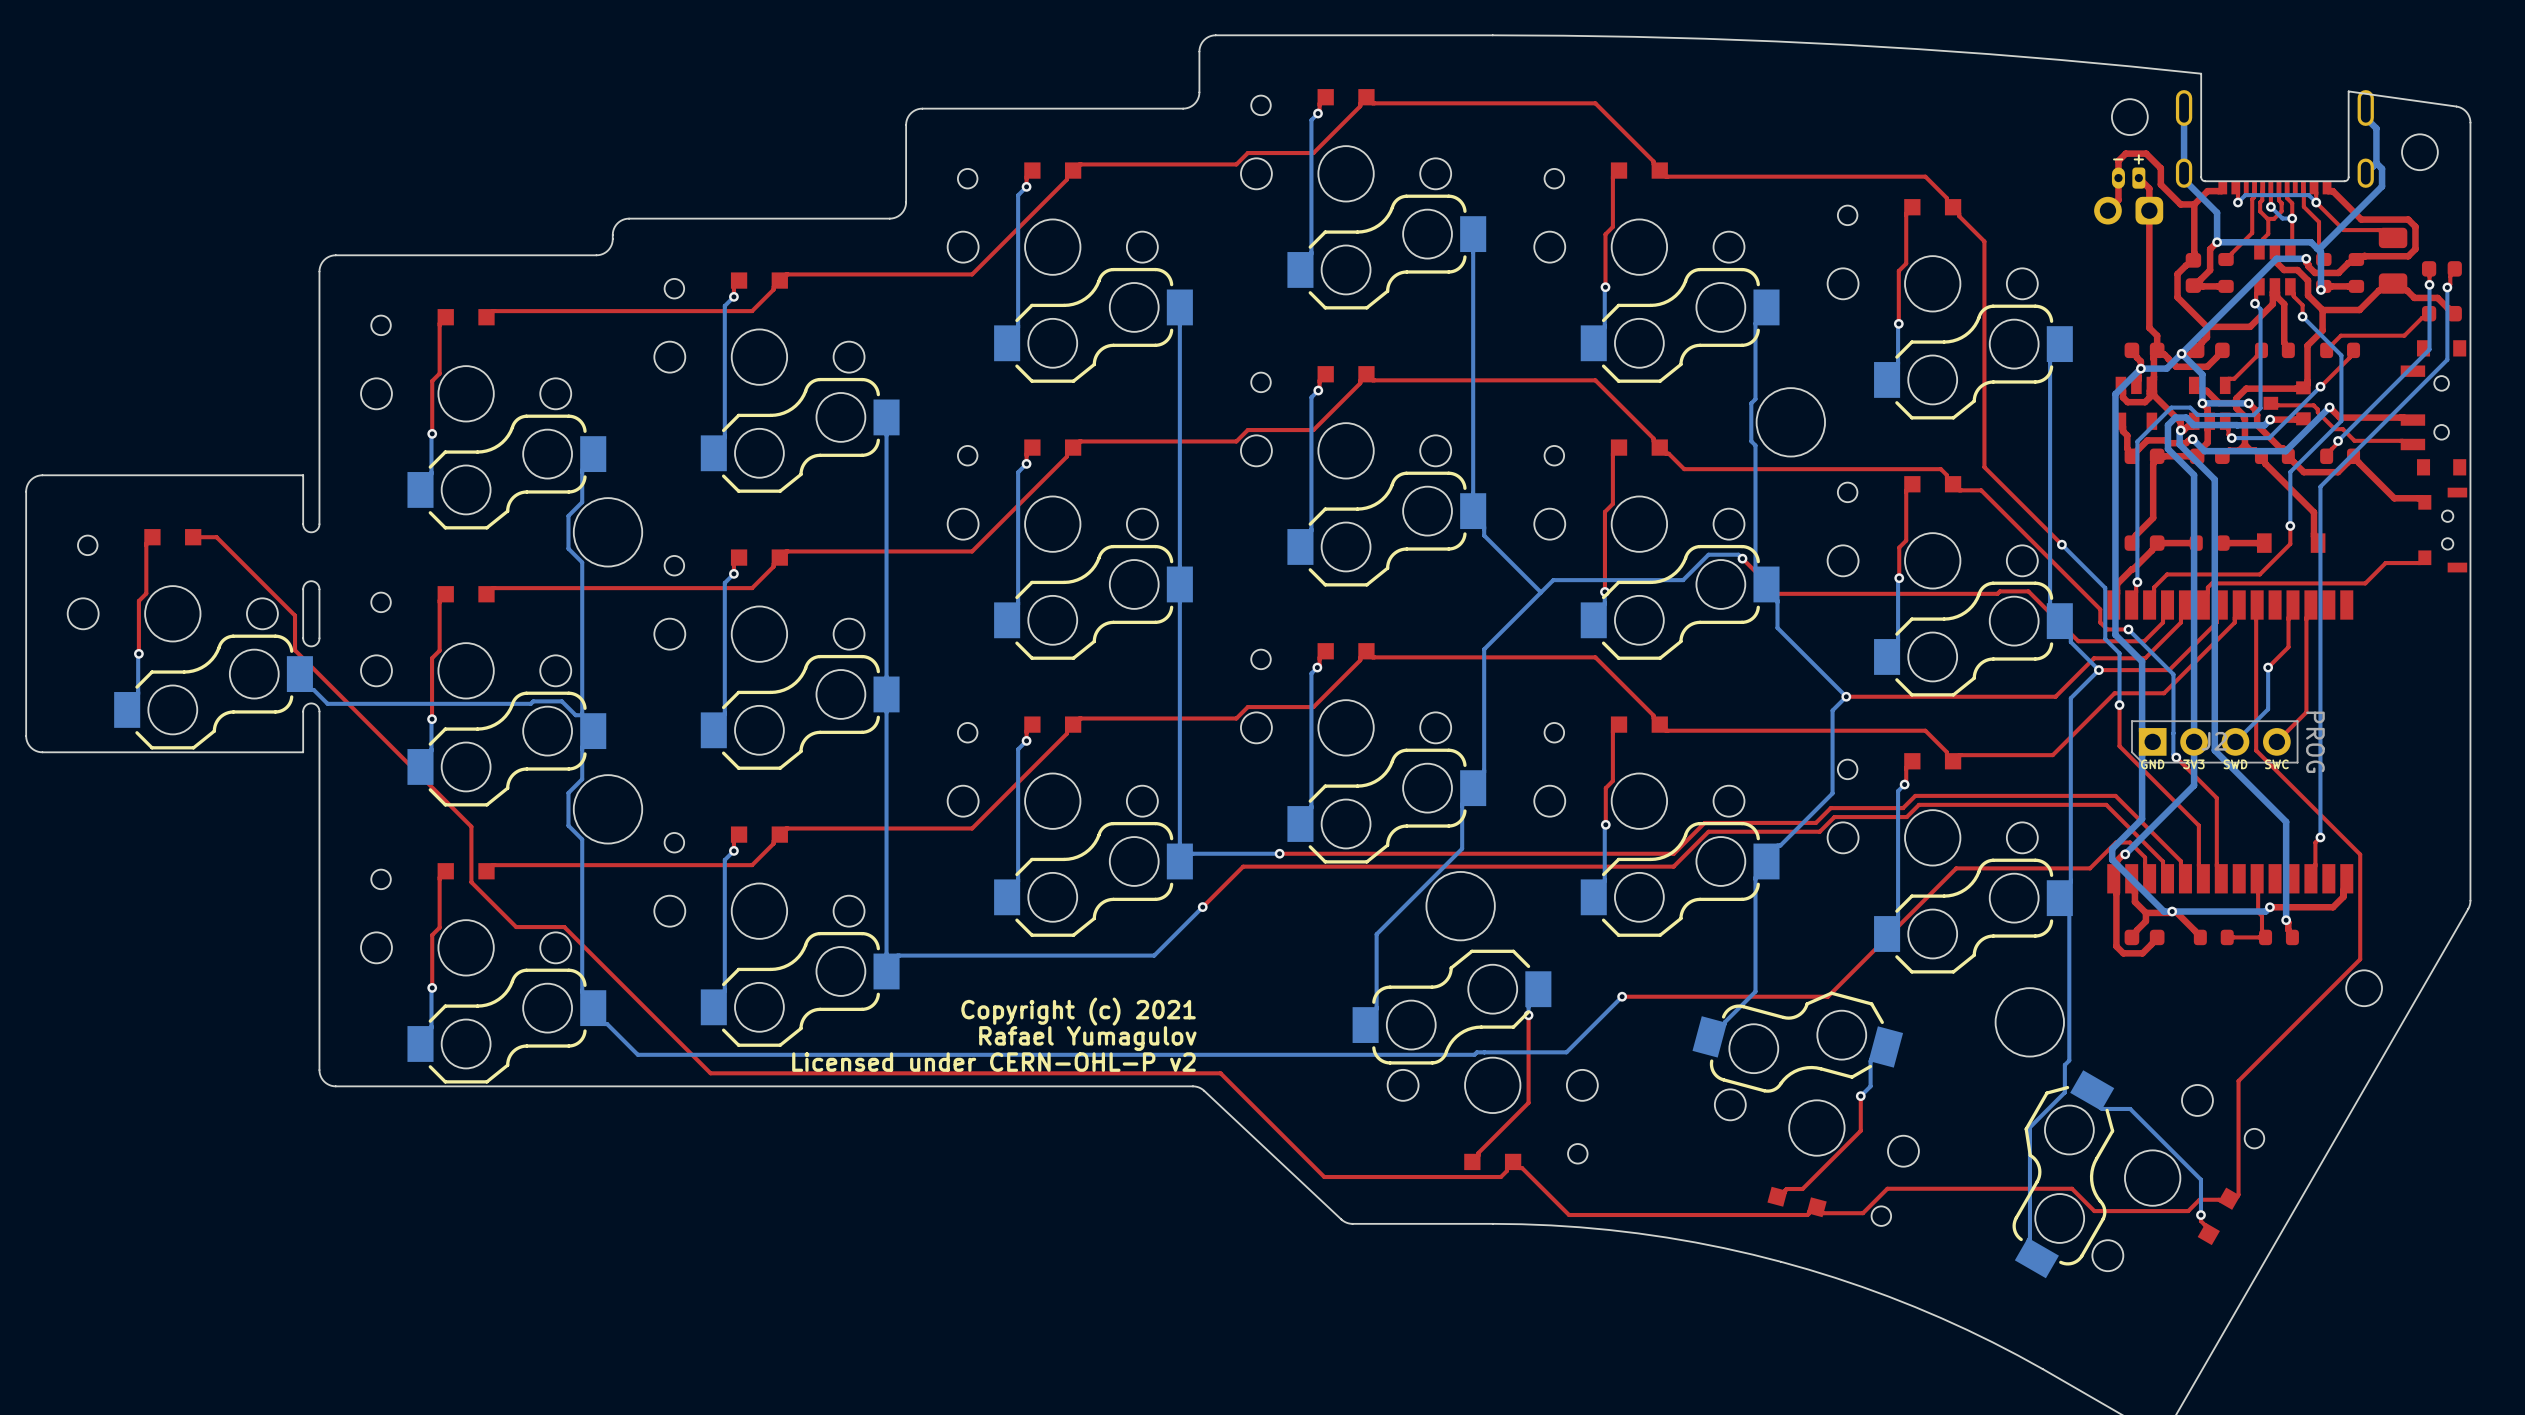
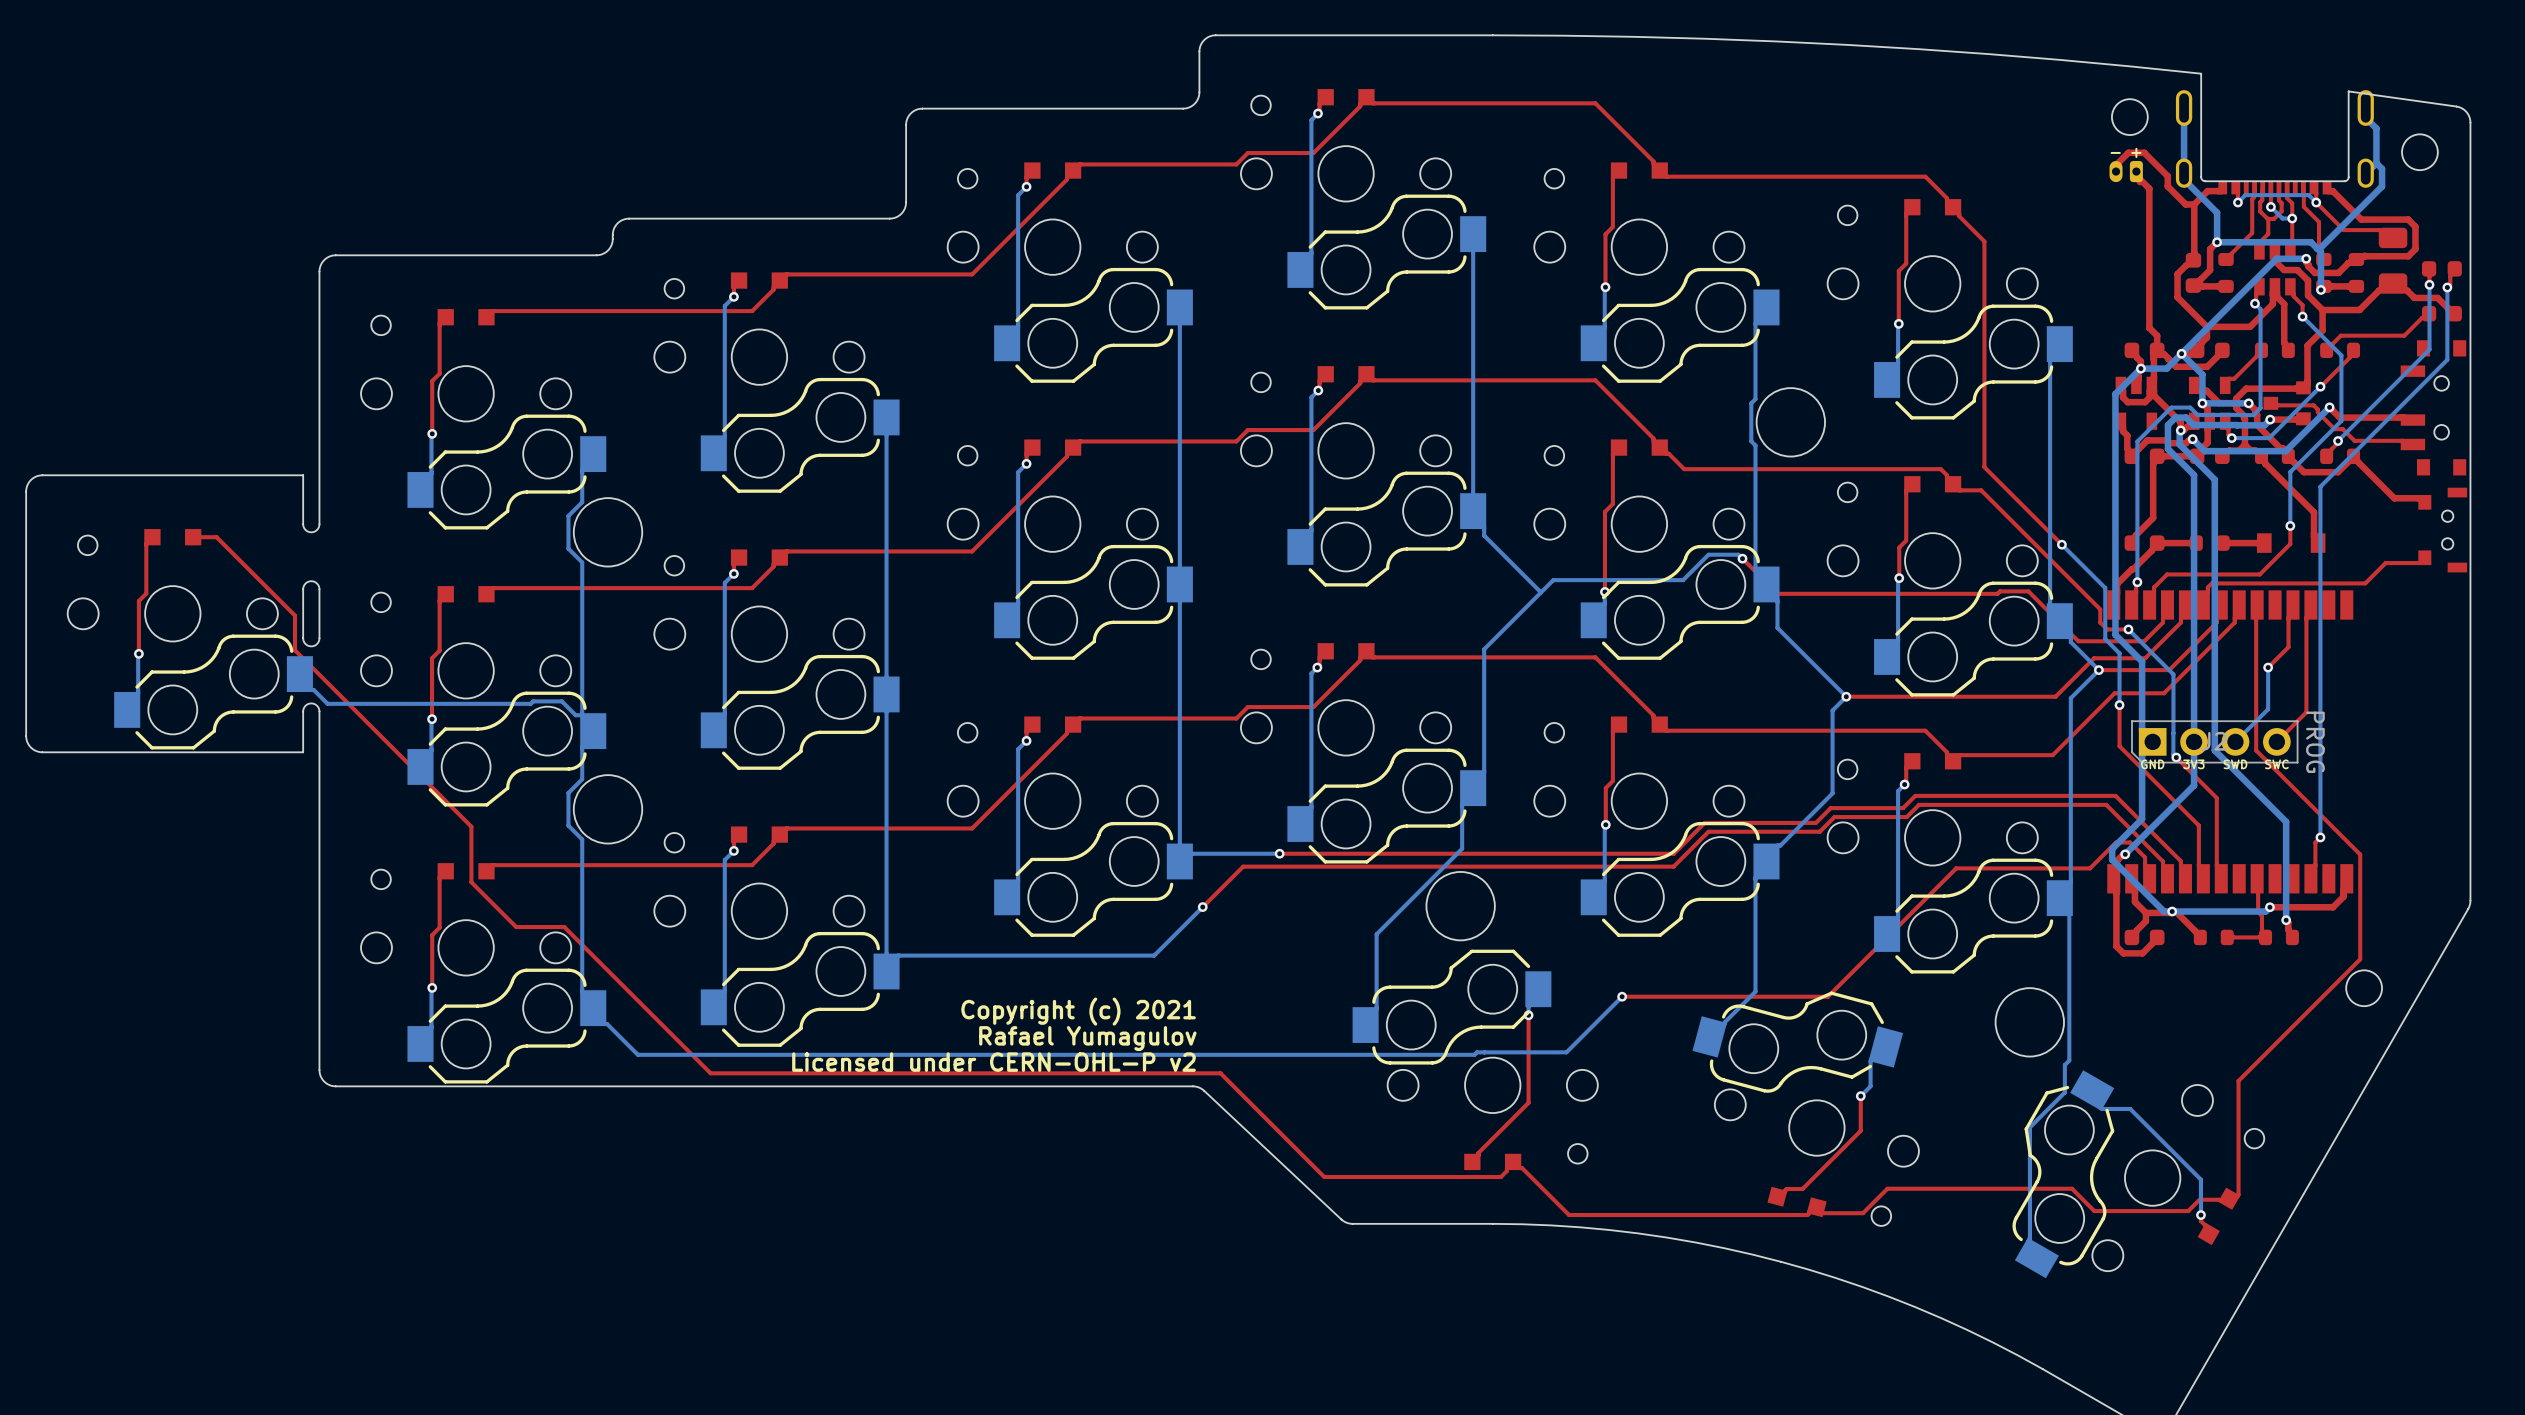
part: none -> (2126, 164)
part: (2128, 189) -> none
top track: (2185, 204) (2180, 204) (2160, 184) (2160, 168) (2146, 153) (2125, 153) (2118, 160) (2118, 200) (2107, 210) -> (2185, 204) (2167, 186) (2167, 176) (2144, 152) (2128, 152) (2116, 165) (2116, 171)

